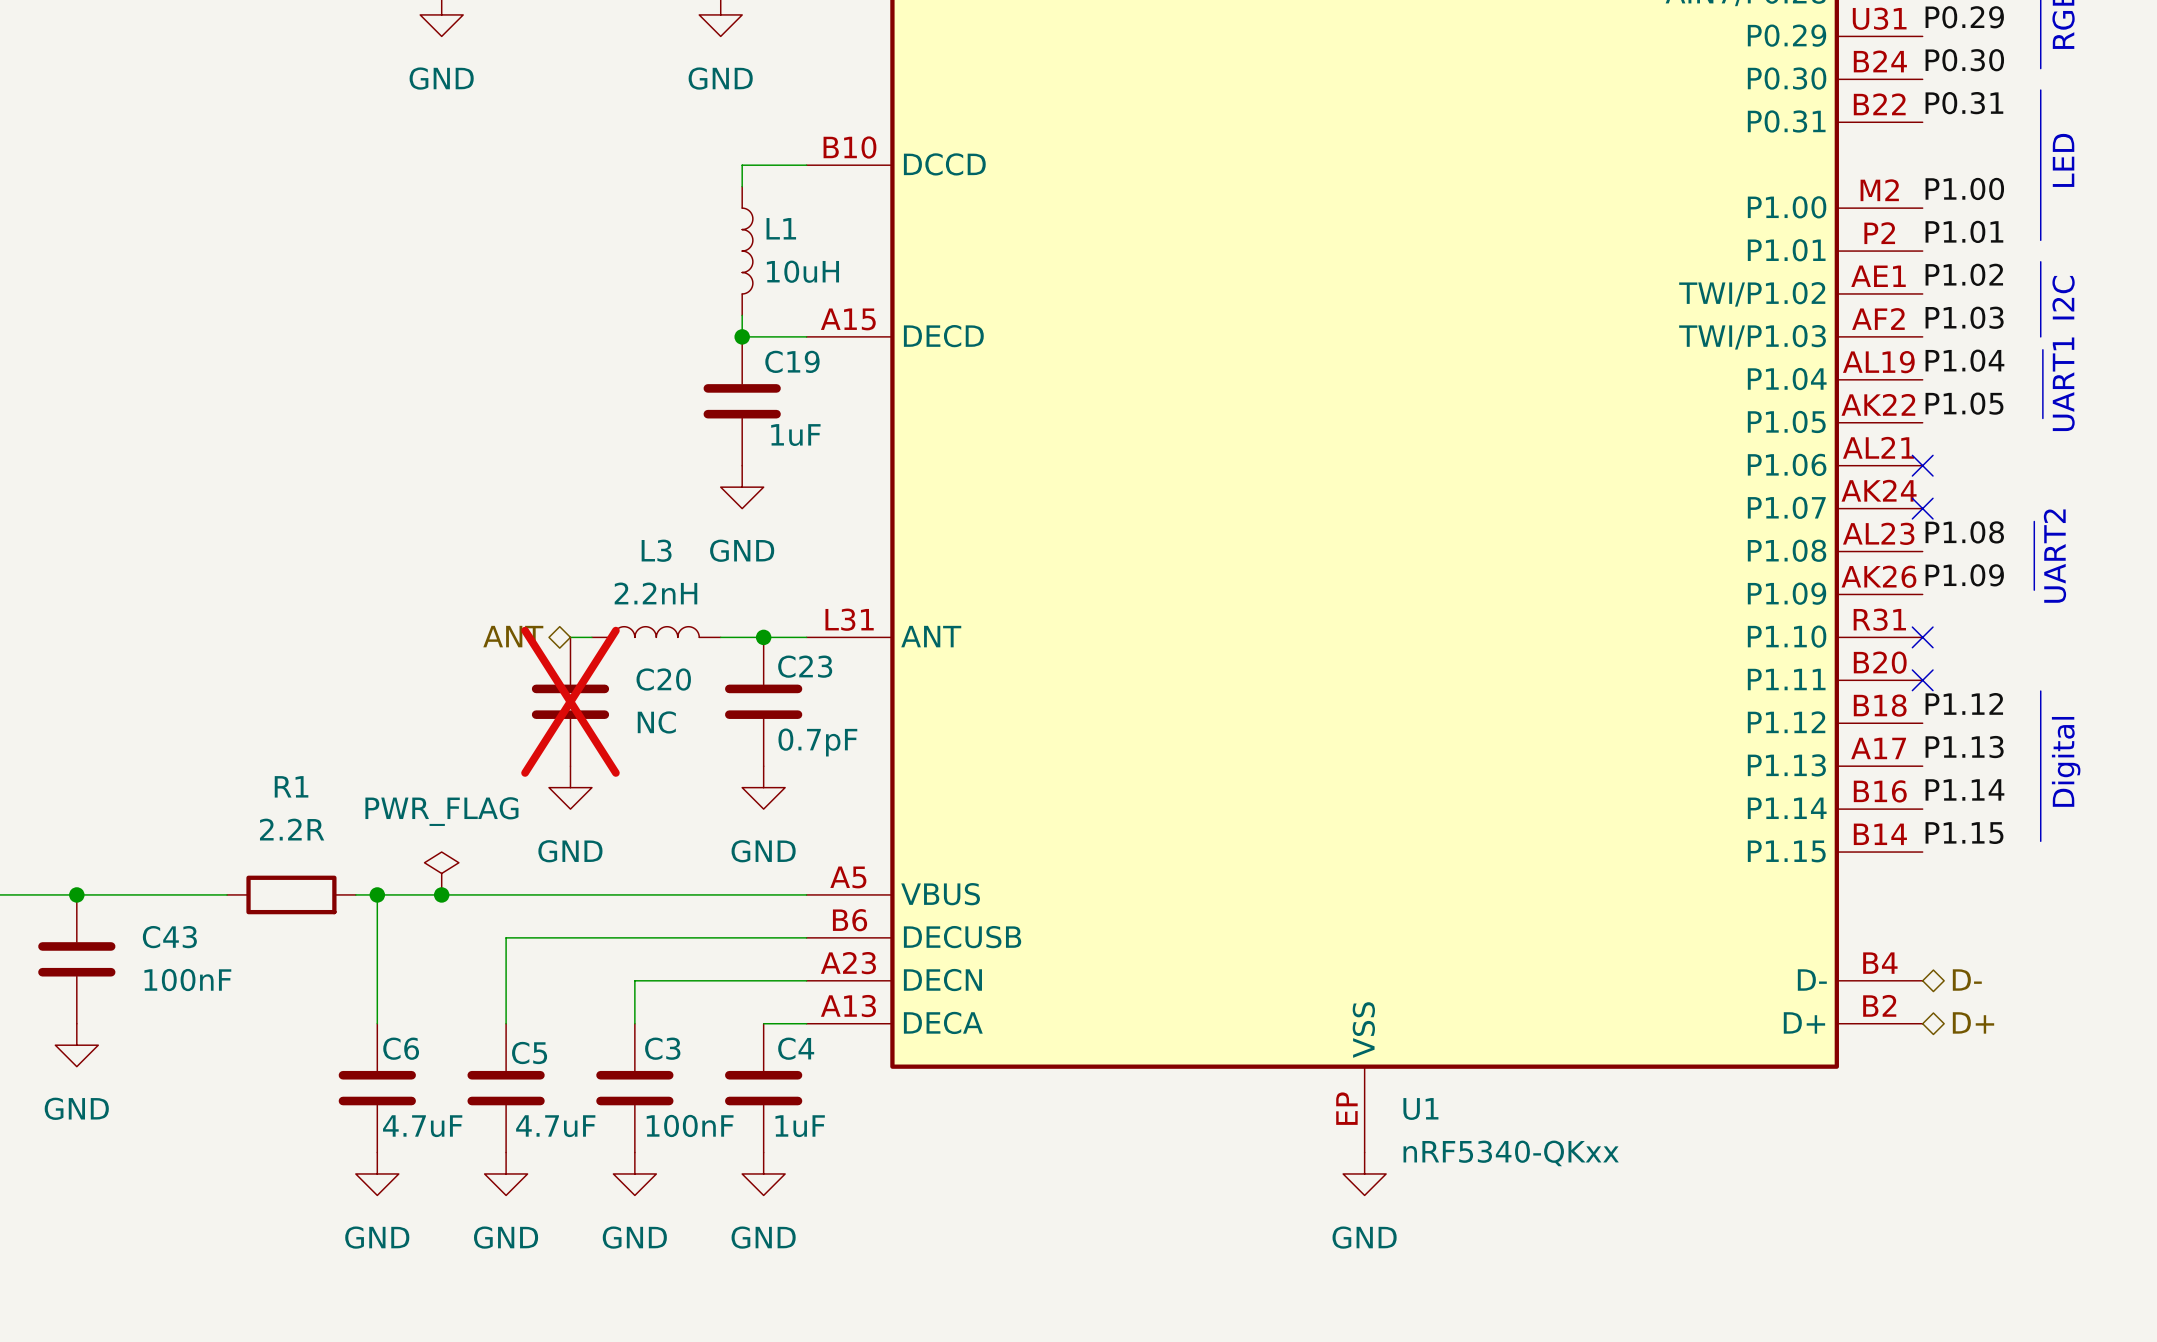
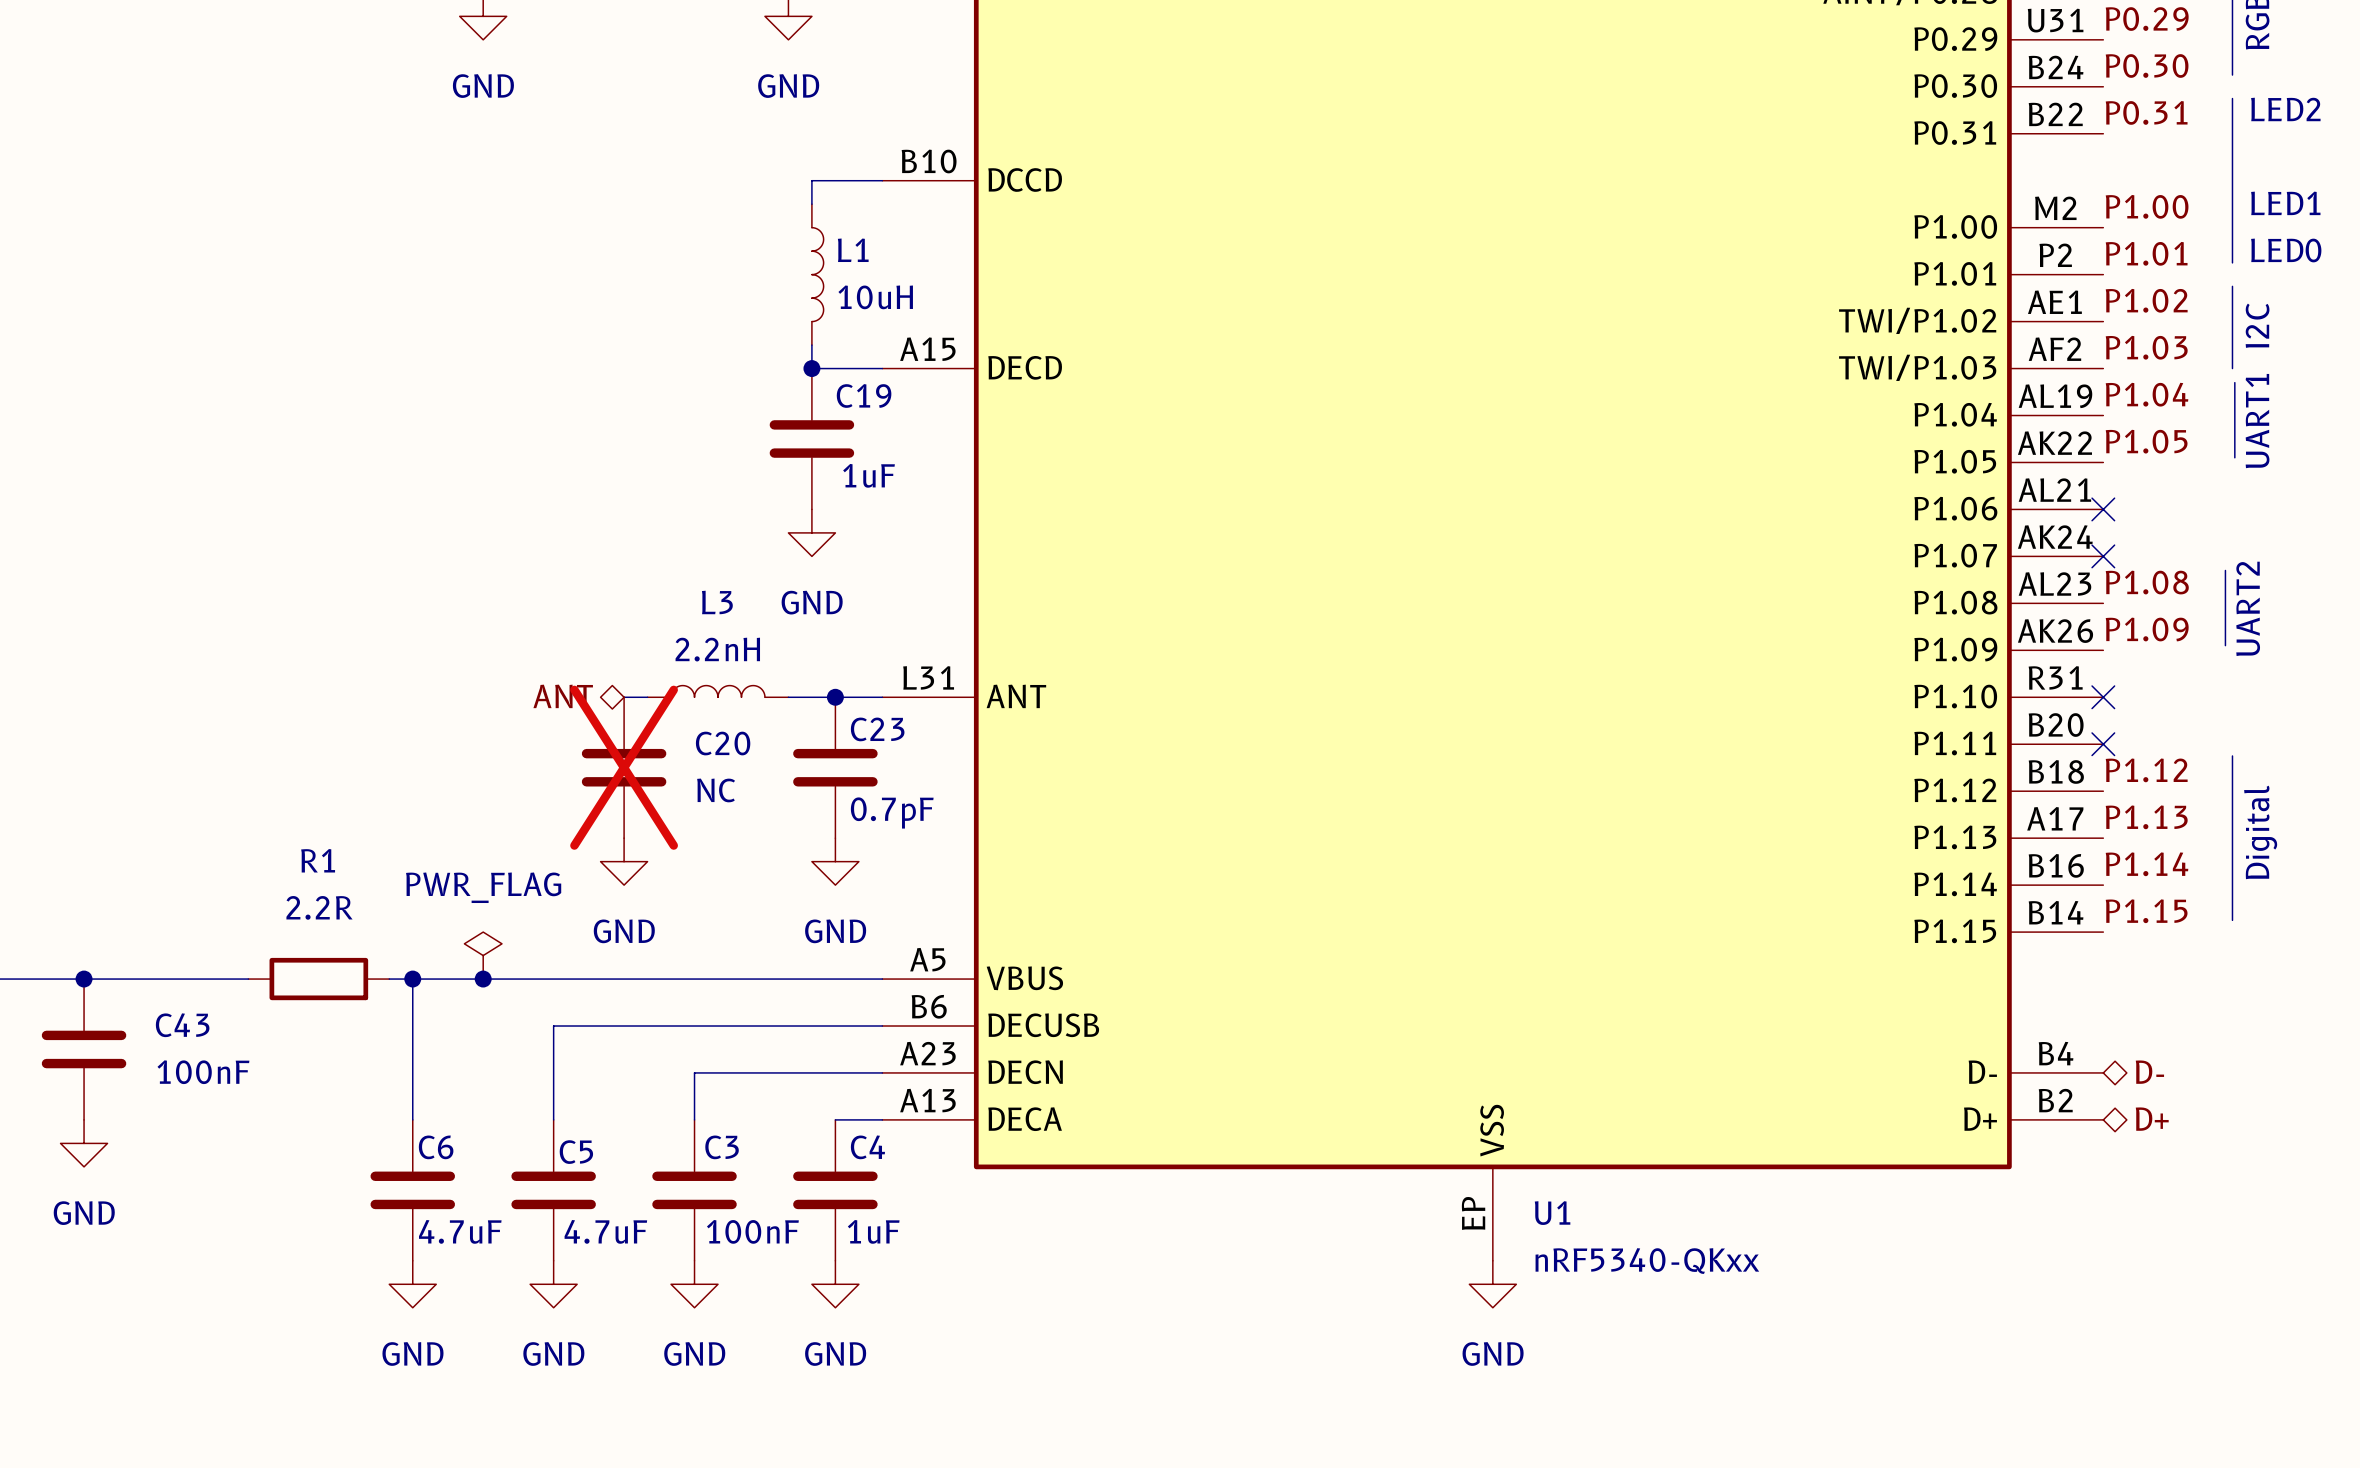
text: none -> LED2 (2285, 109)
text: LED (2063, 160) -> LED1 (2285, 203)
text: none -> LED0 (2286, 250)

